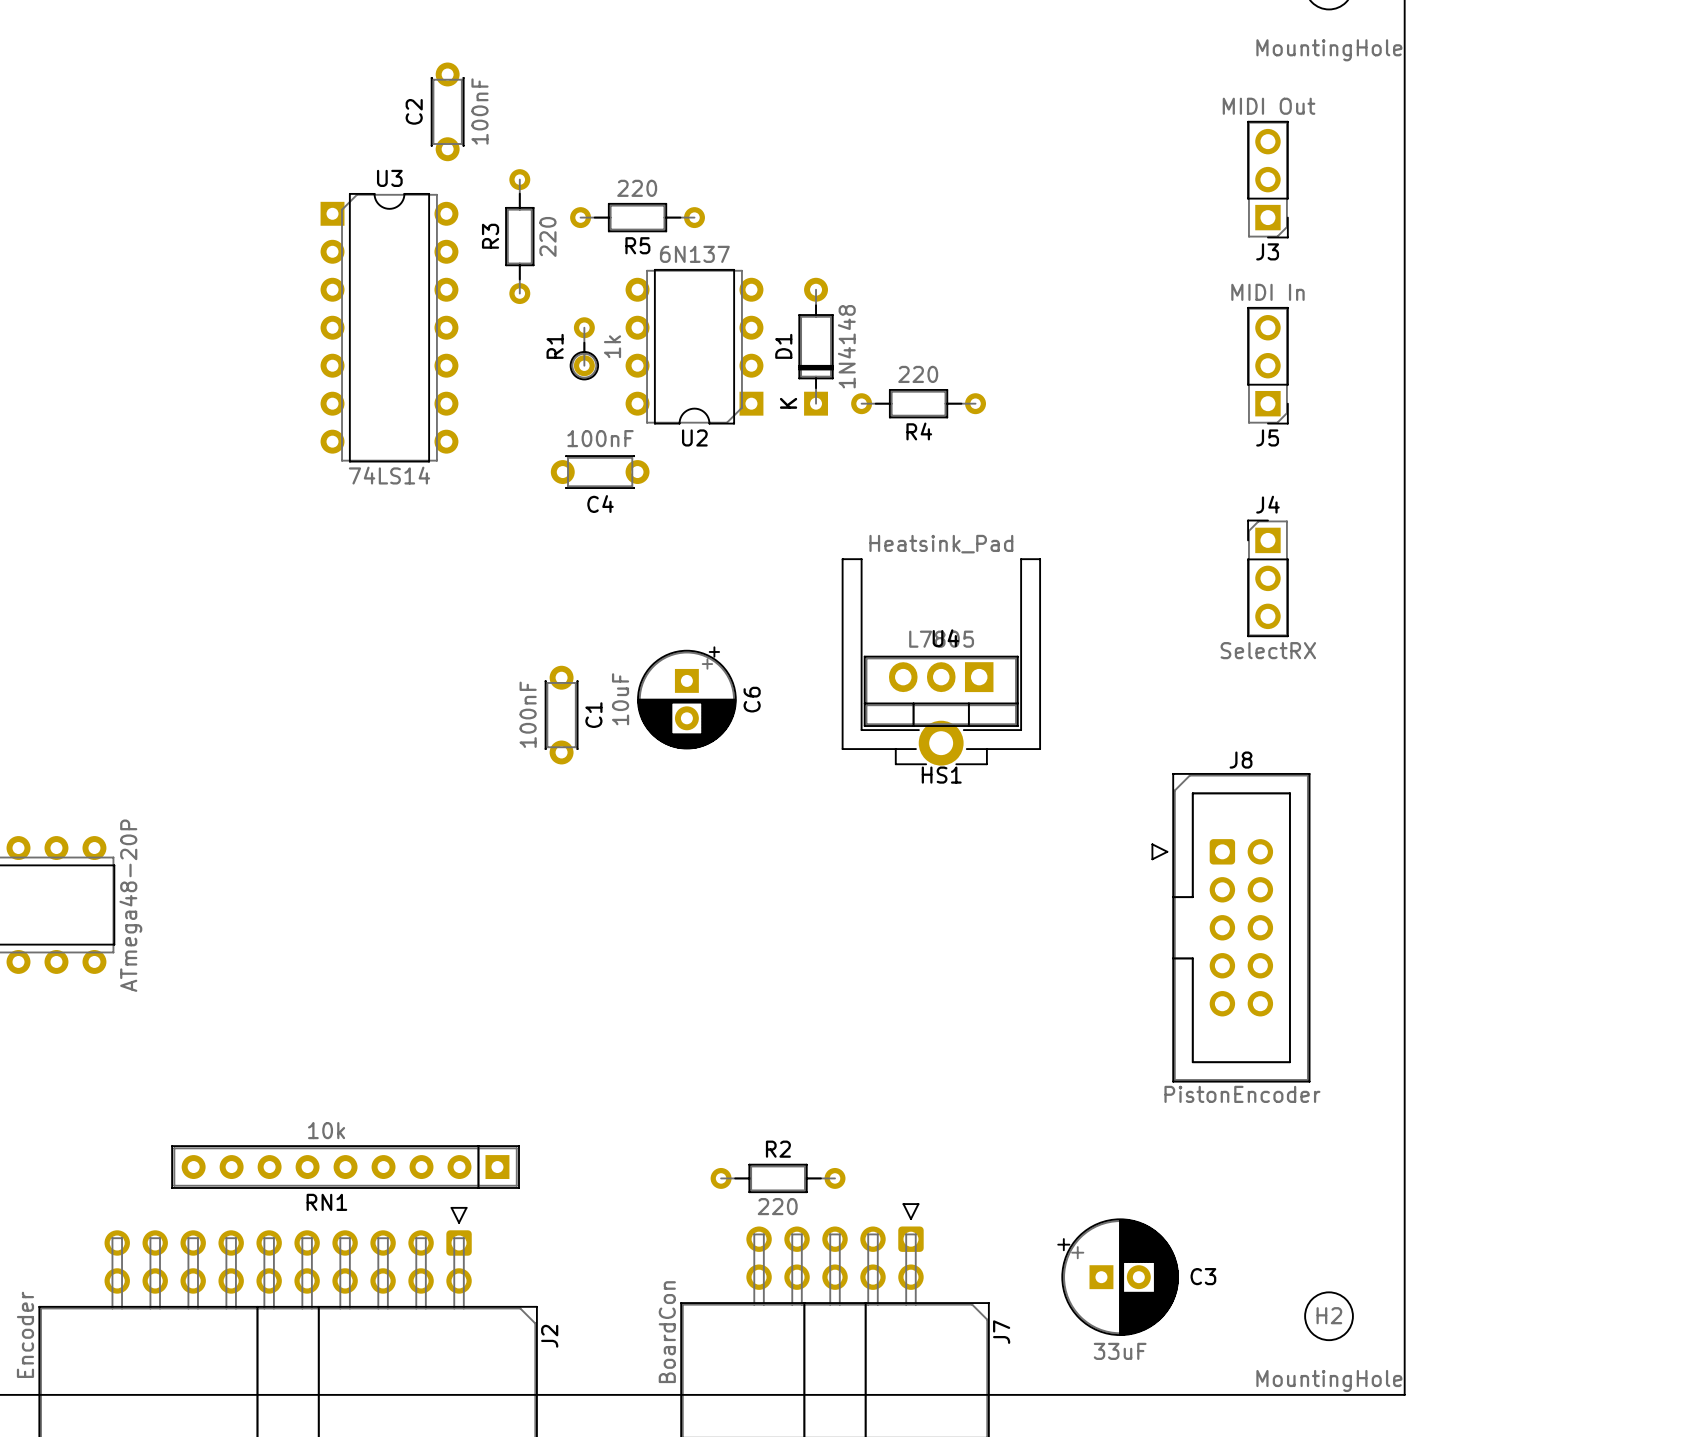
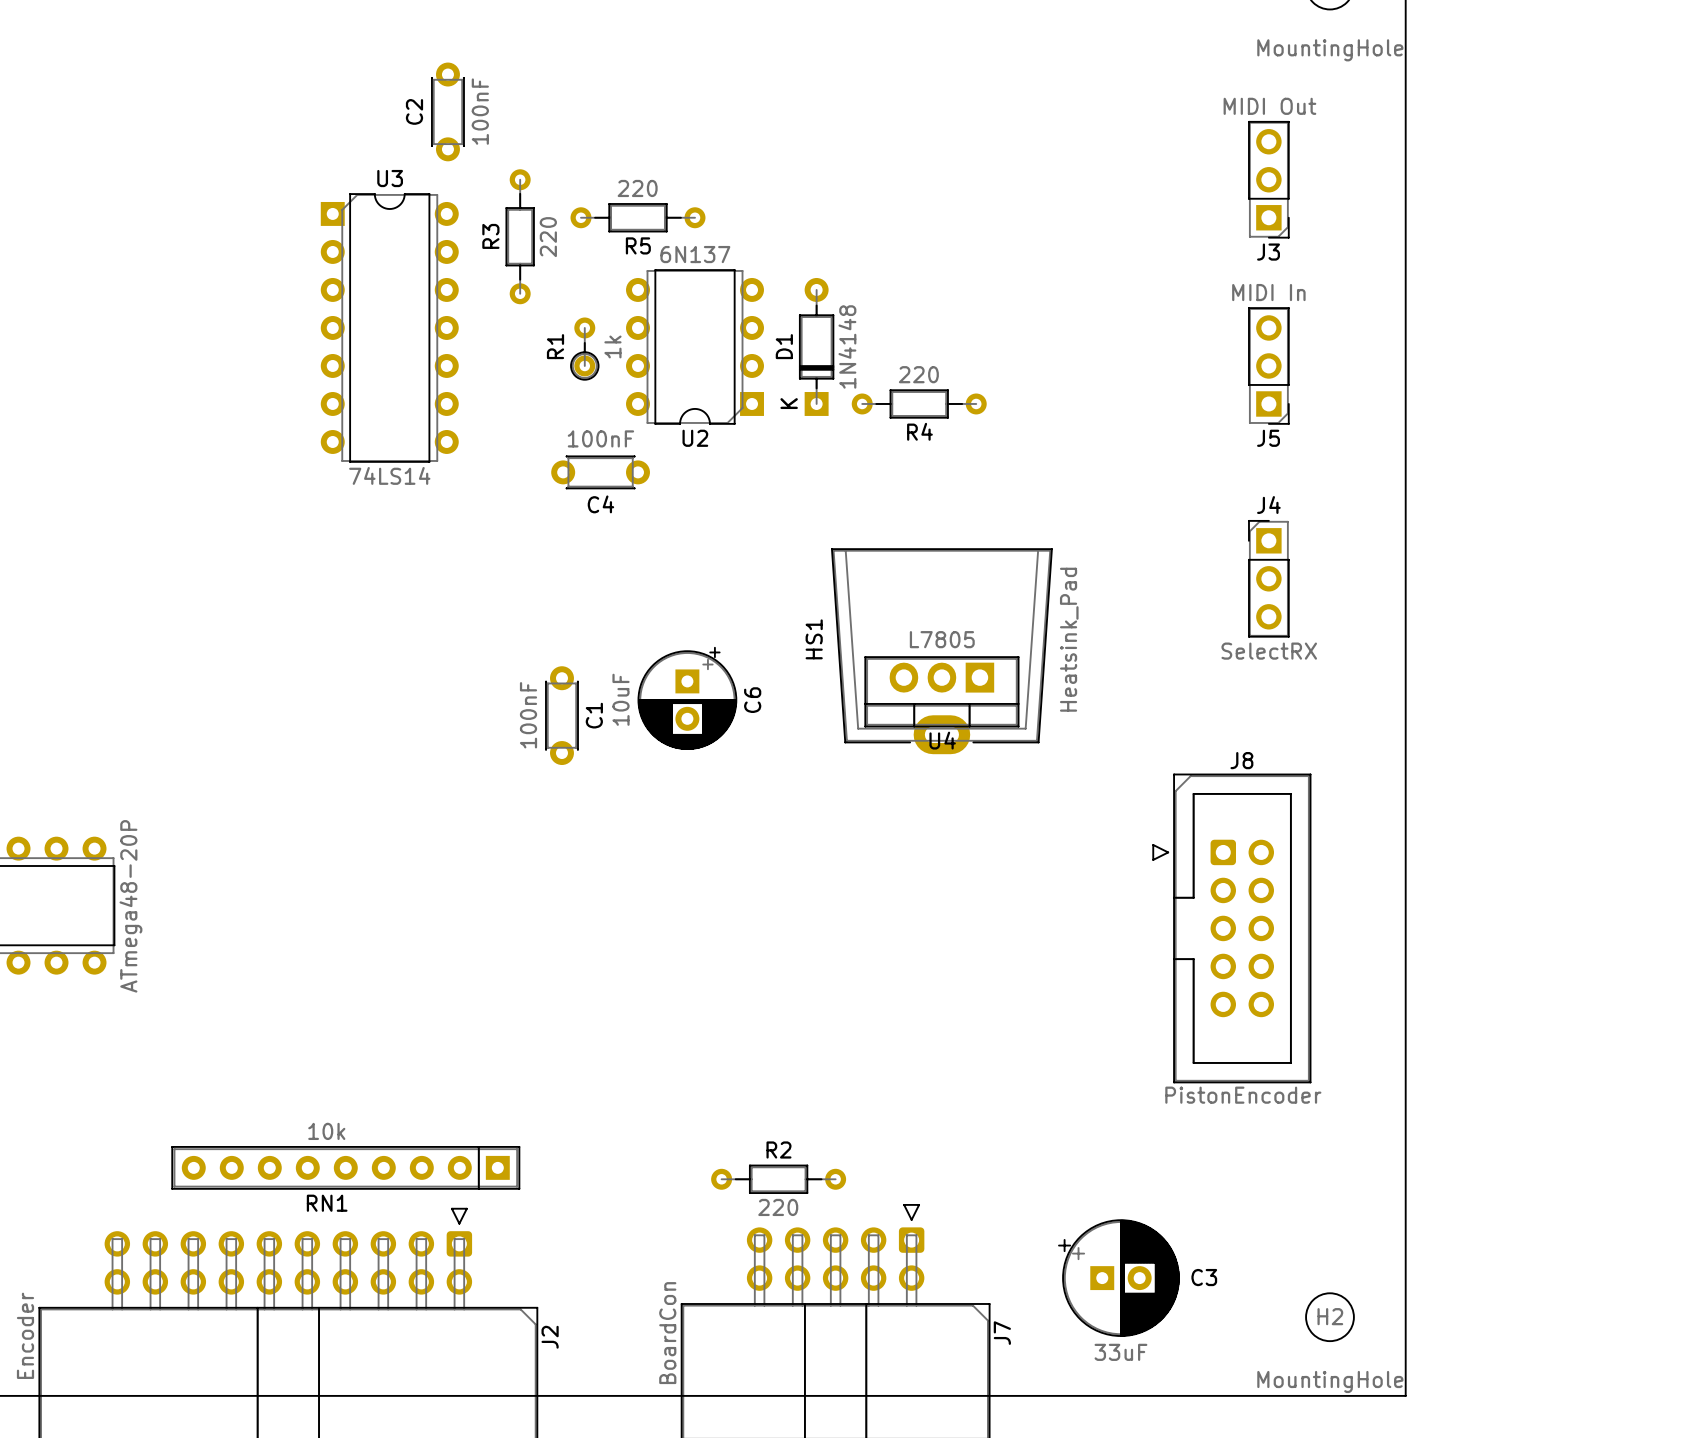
HS1 value position: Heatsink_Pad (941, 544) -> Heatsink_Pad (1069, 639)
HS1 footprint: [841, 558, 1041, 766] -> [831, 548, 1053, 755]
U4 name position: U4 (945, 638) -> U4 (942, 740)
HS1 name position: HS1 (941, 775) -> HS1 (814, 639)

